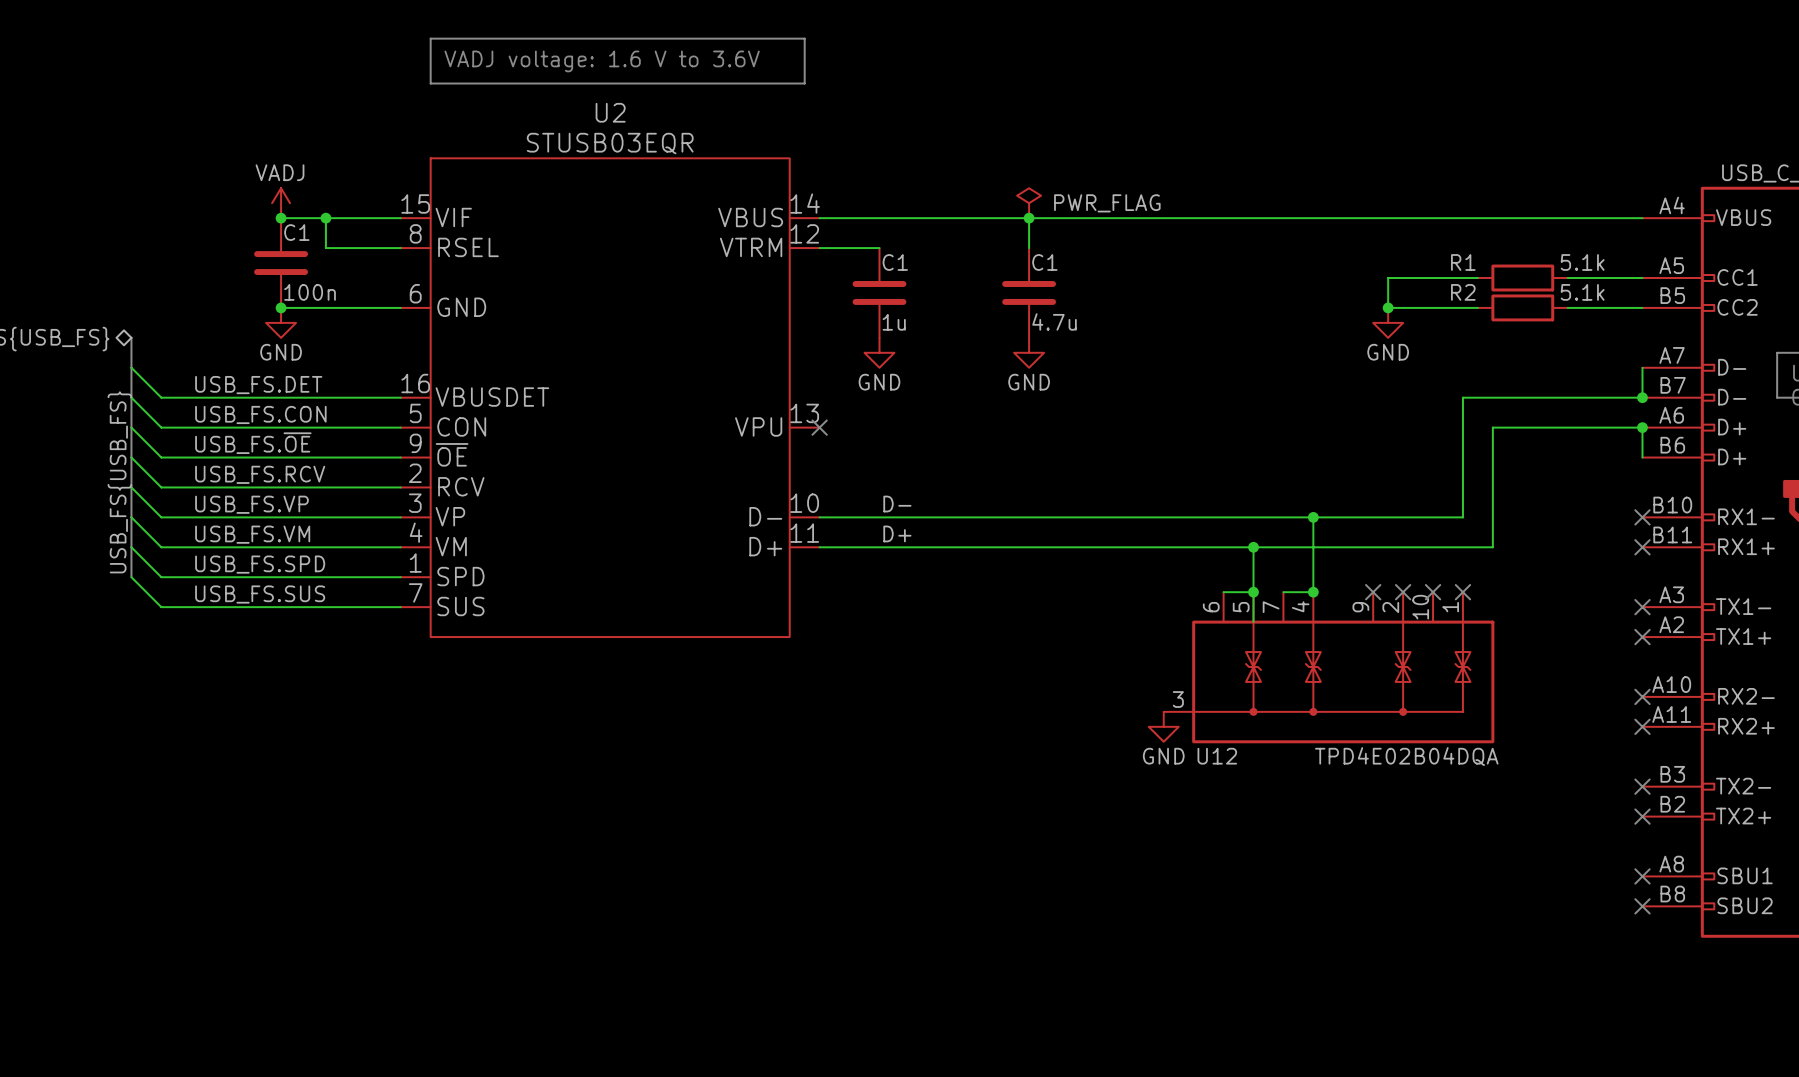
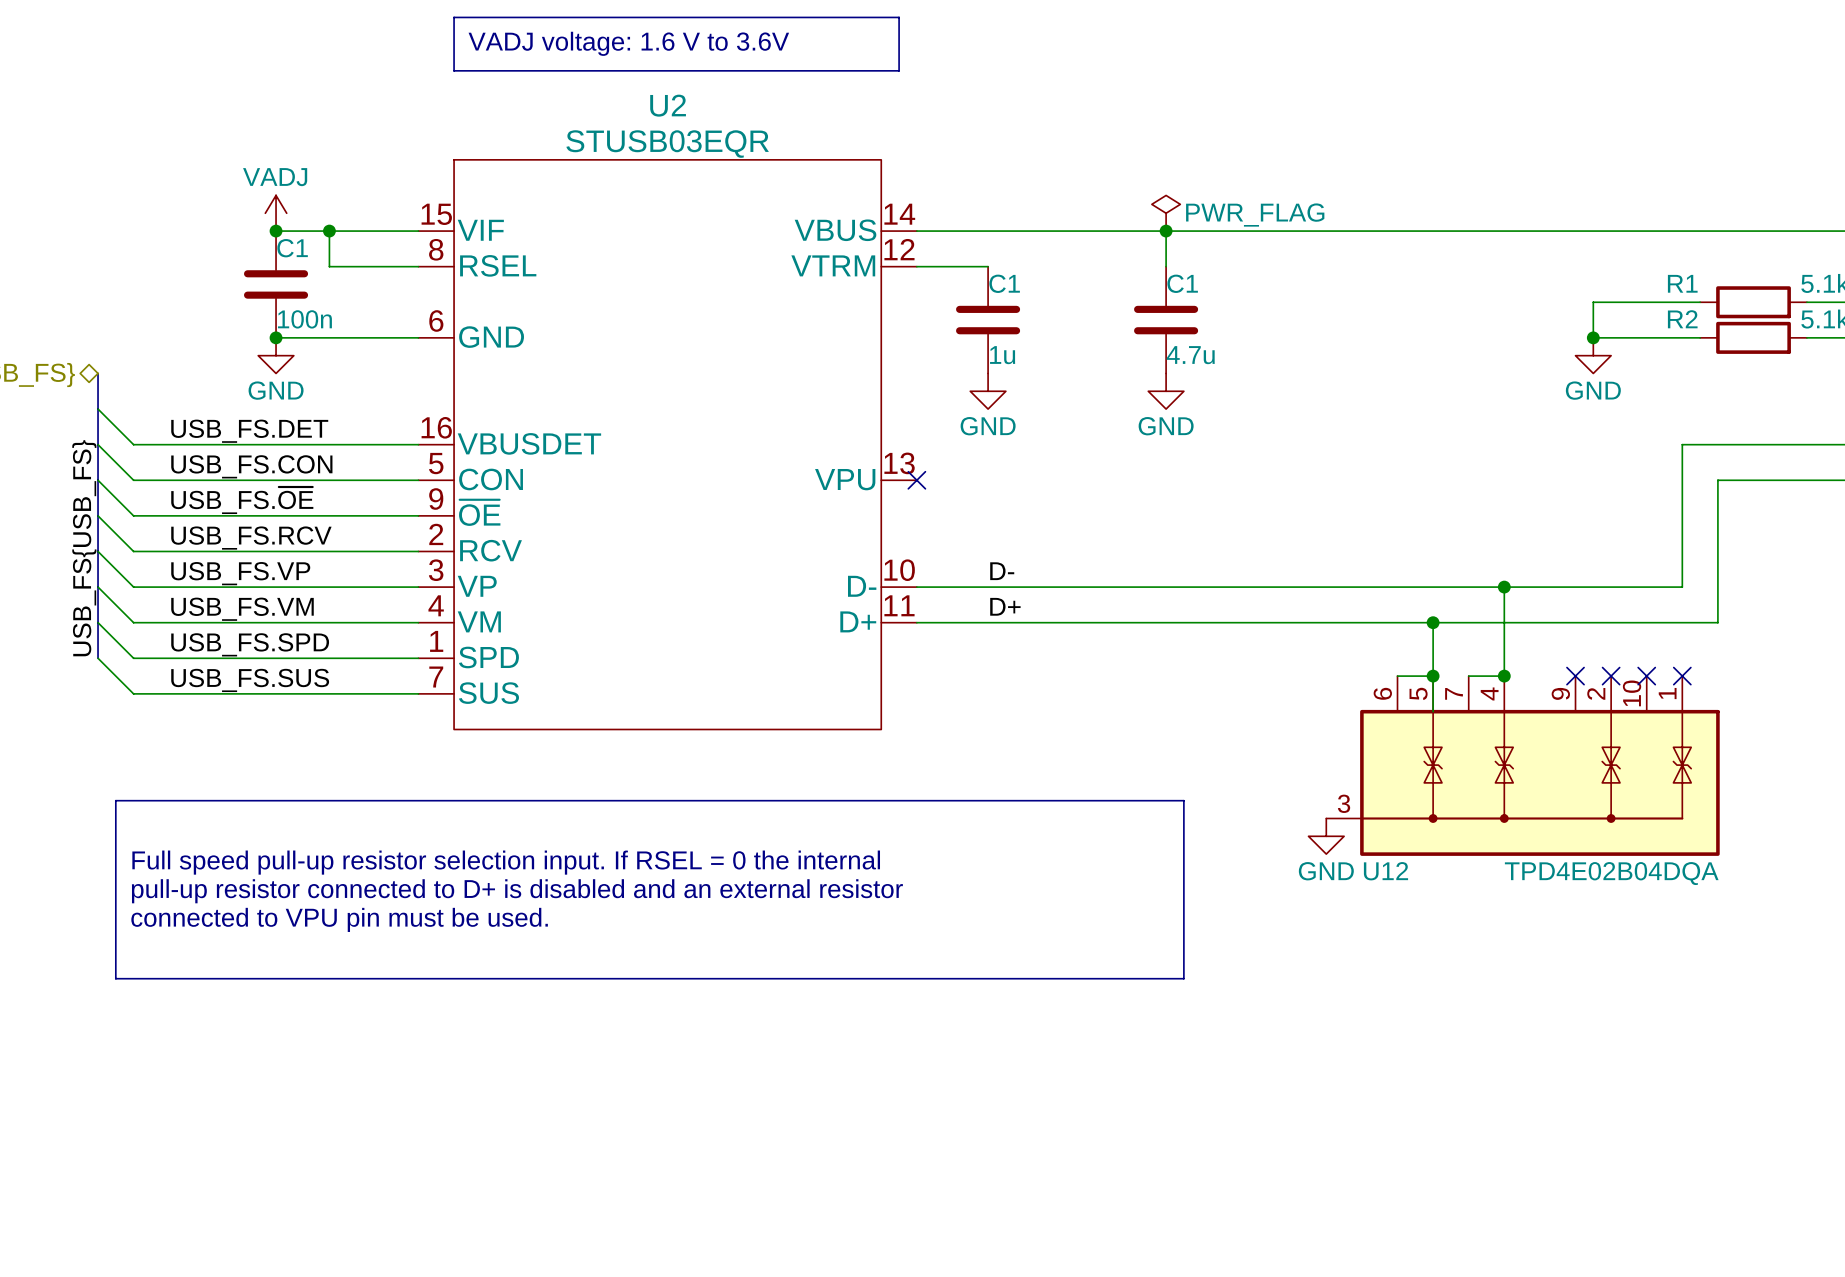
line: none -> (115, 800) (1183, 800) (1183, 978) (115, 978) (115, 800)
text: none -> Full speed pull-up resistor selection input. If RSEL = 0 the internal (506, 862)
text: none -> pull-up resistor connected to D+ is disabled and an external resistor (517, 891)
text: none -> connected to VPU pin must be used. (339, 919)

